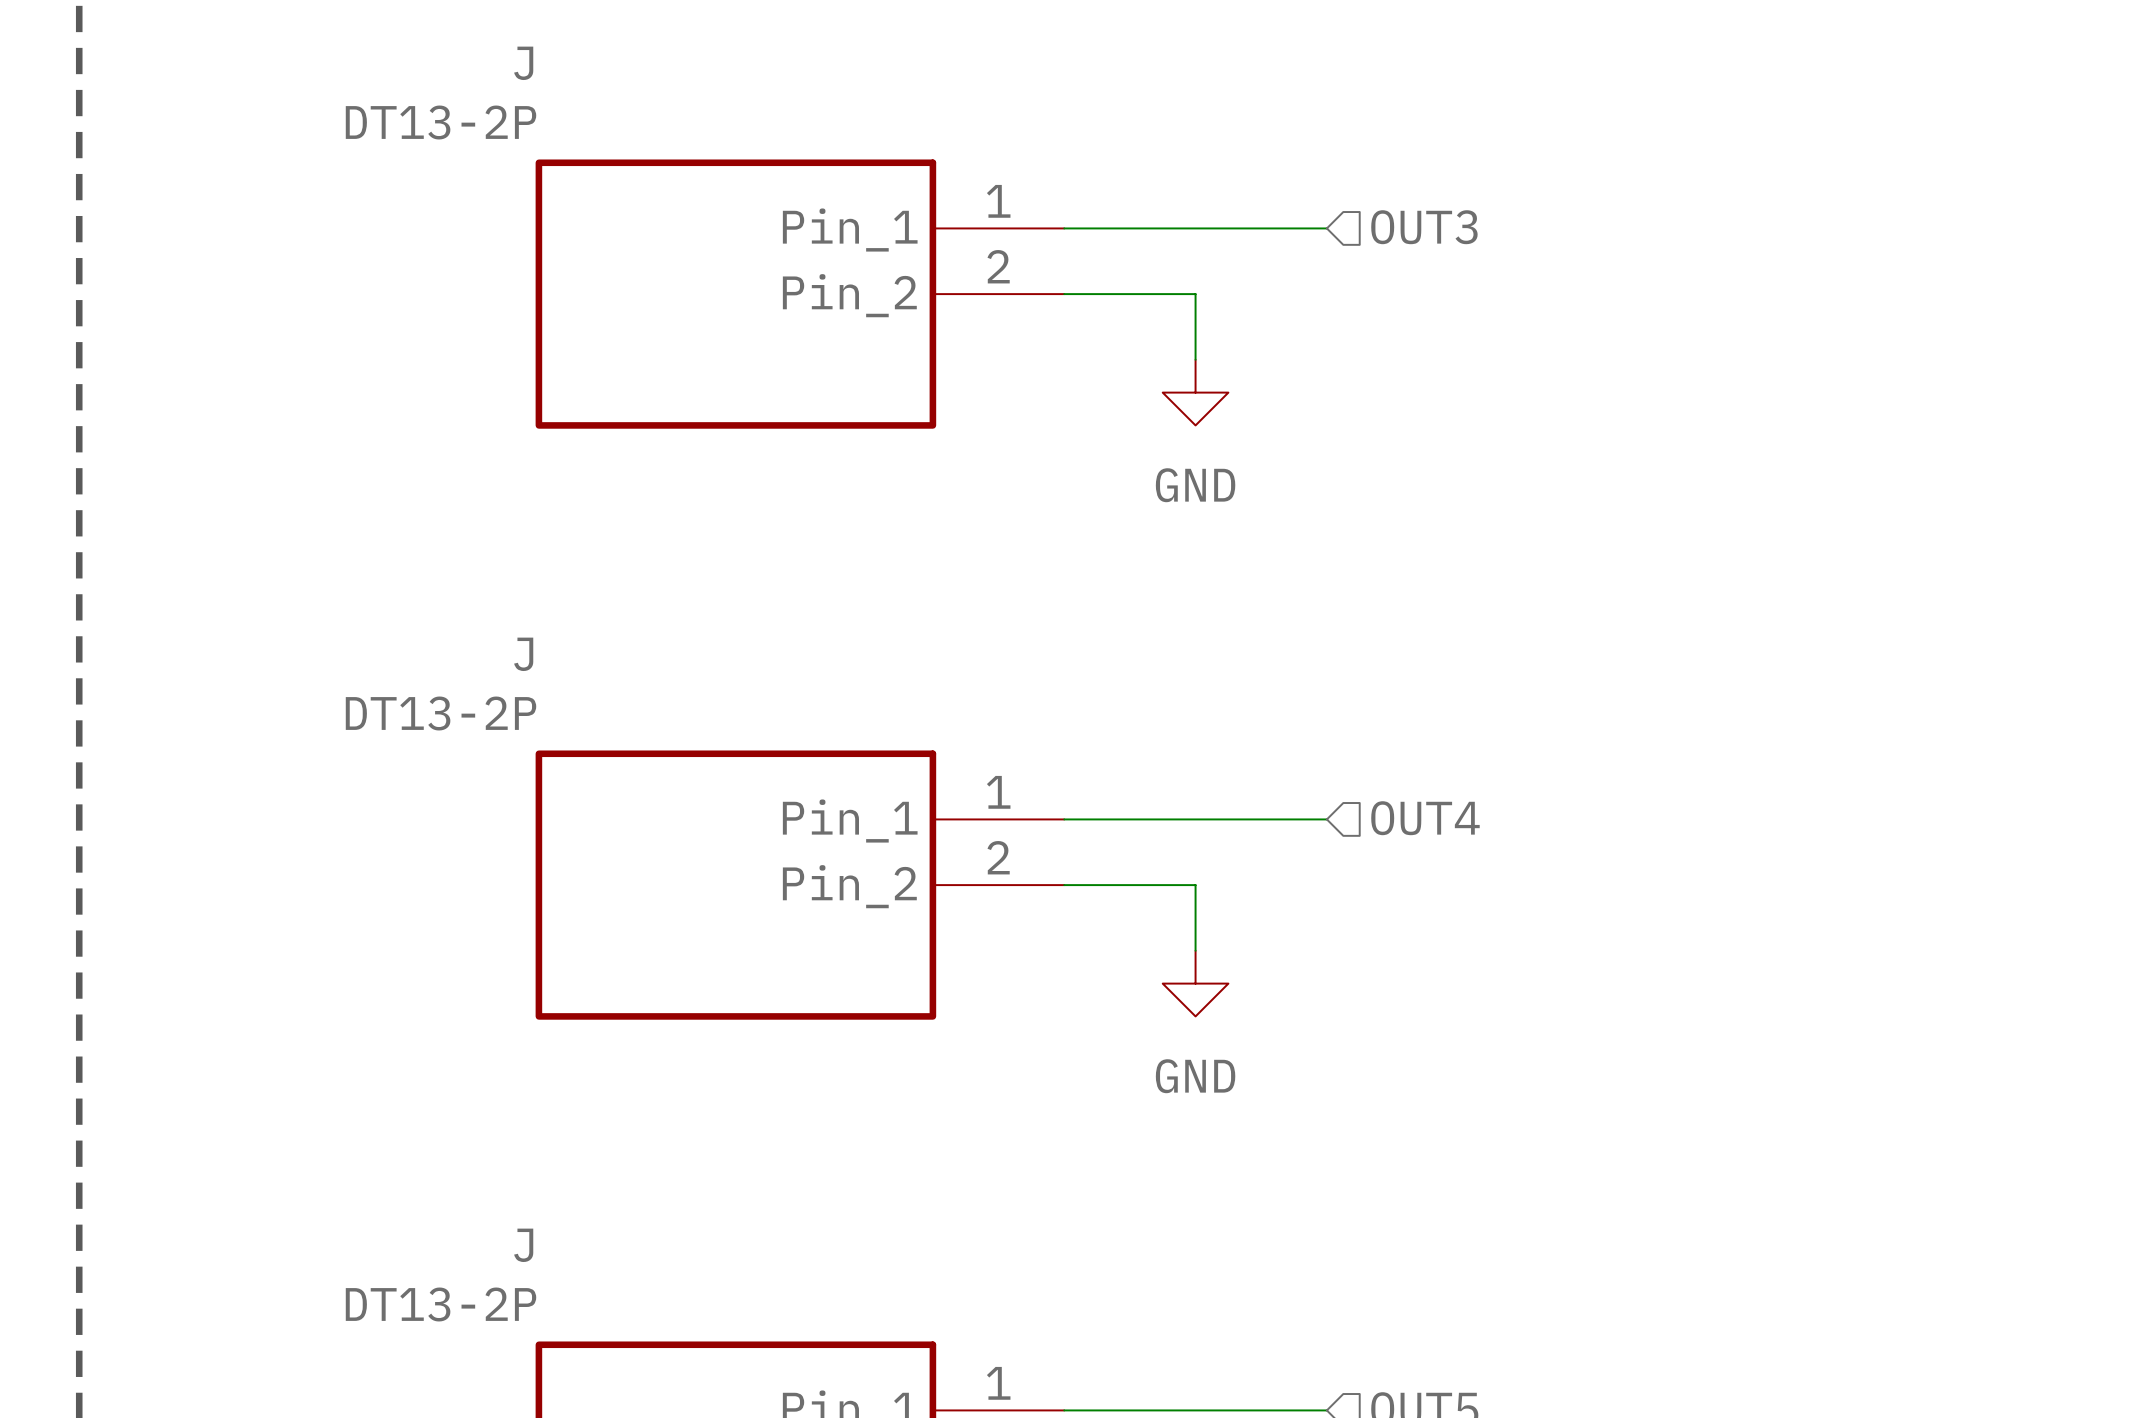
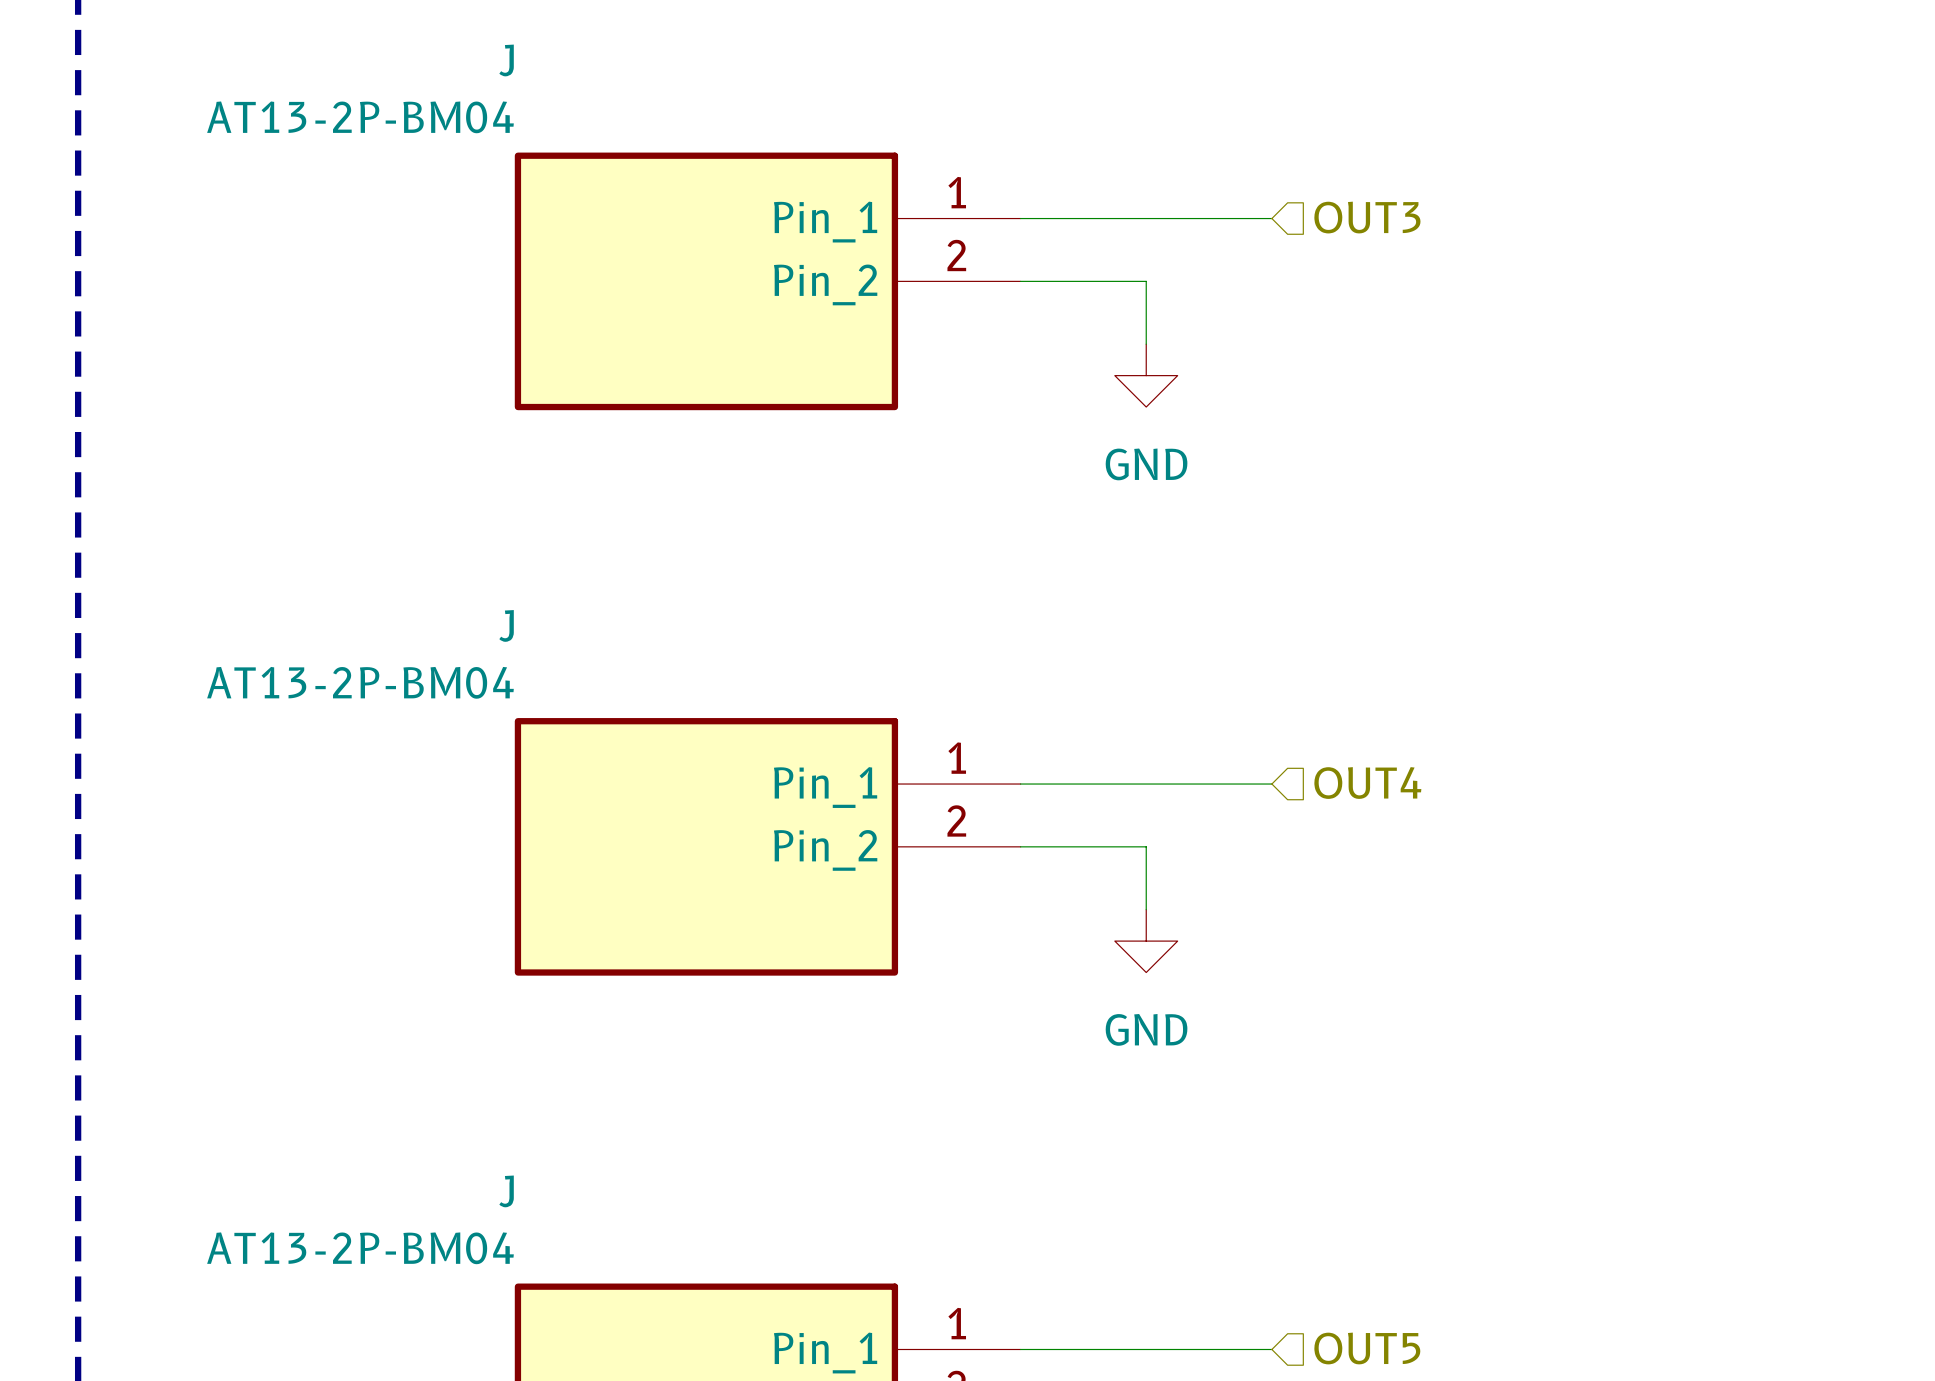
J value: DT13-2P (441, 122) -> AT13-2P-BM04 (360, 117)
J value: DT13-2P (441, 713) -> AT13-2P-BM04 (360, 682)
J value: DT13-2P (441, 1304) -> AT13-2P-BM04 (360, 1248)

